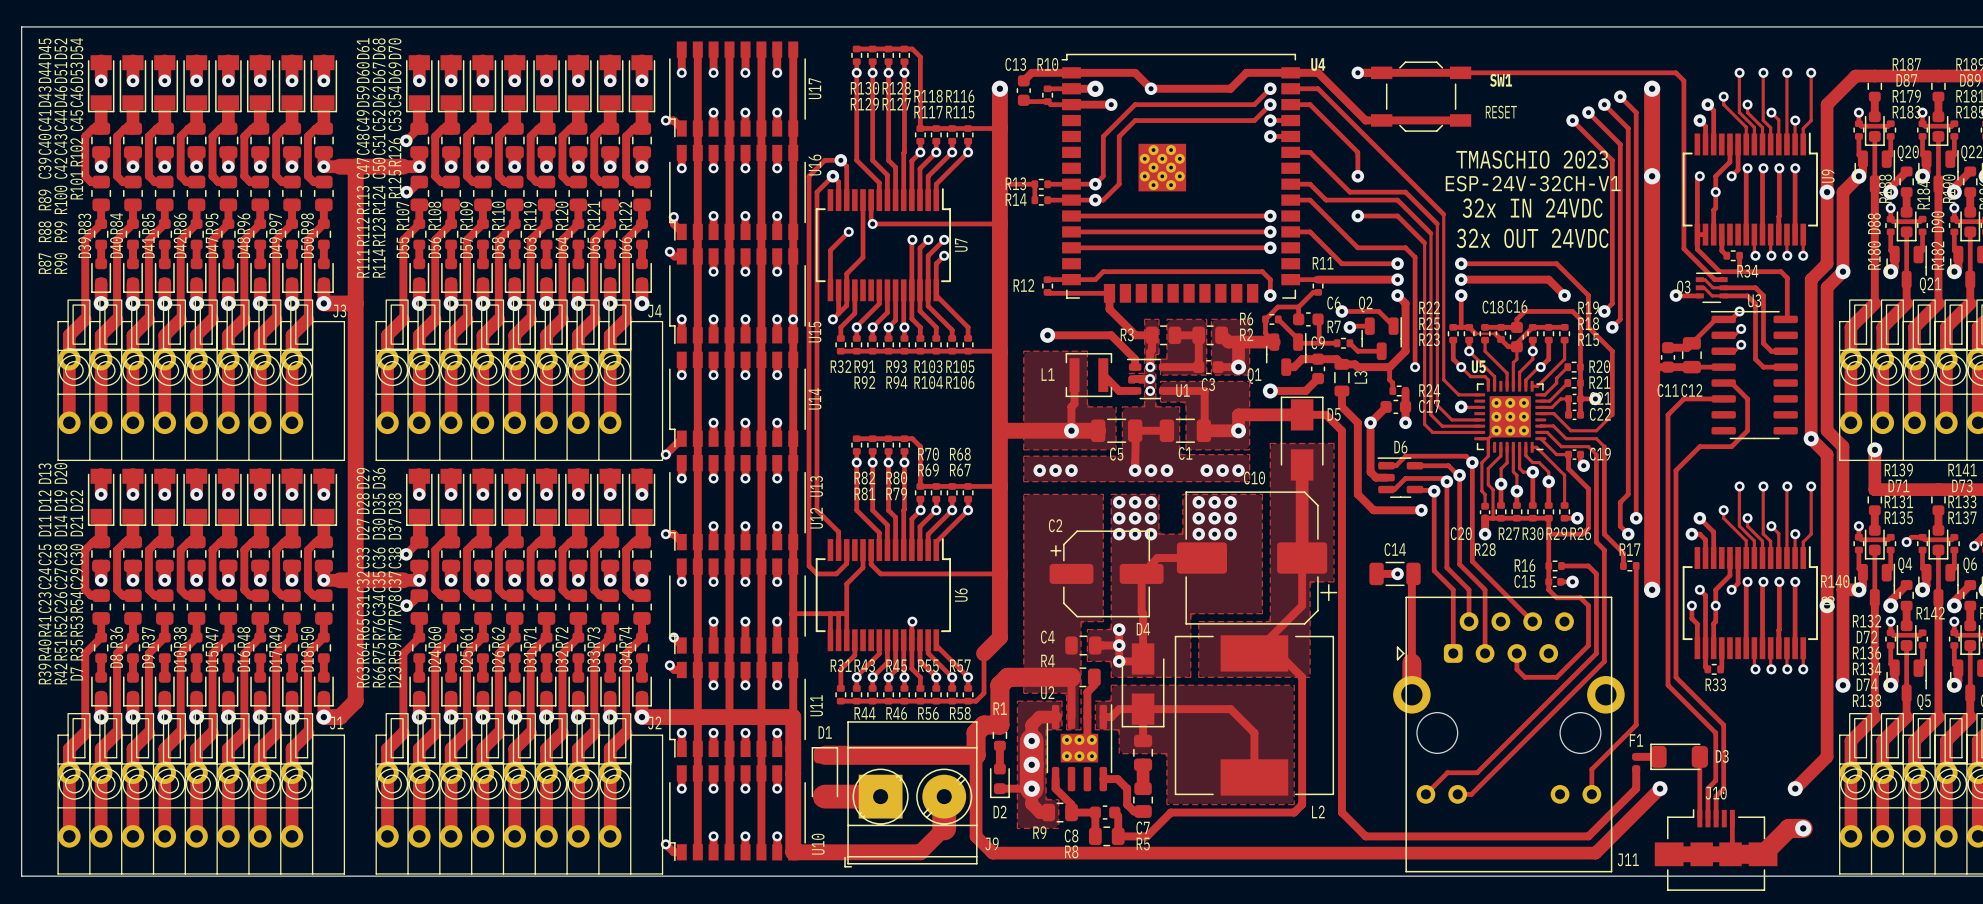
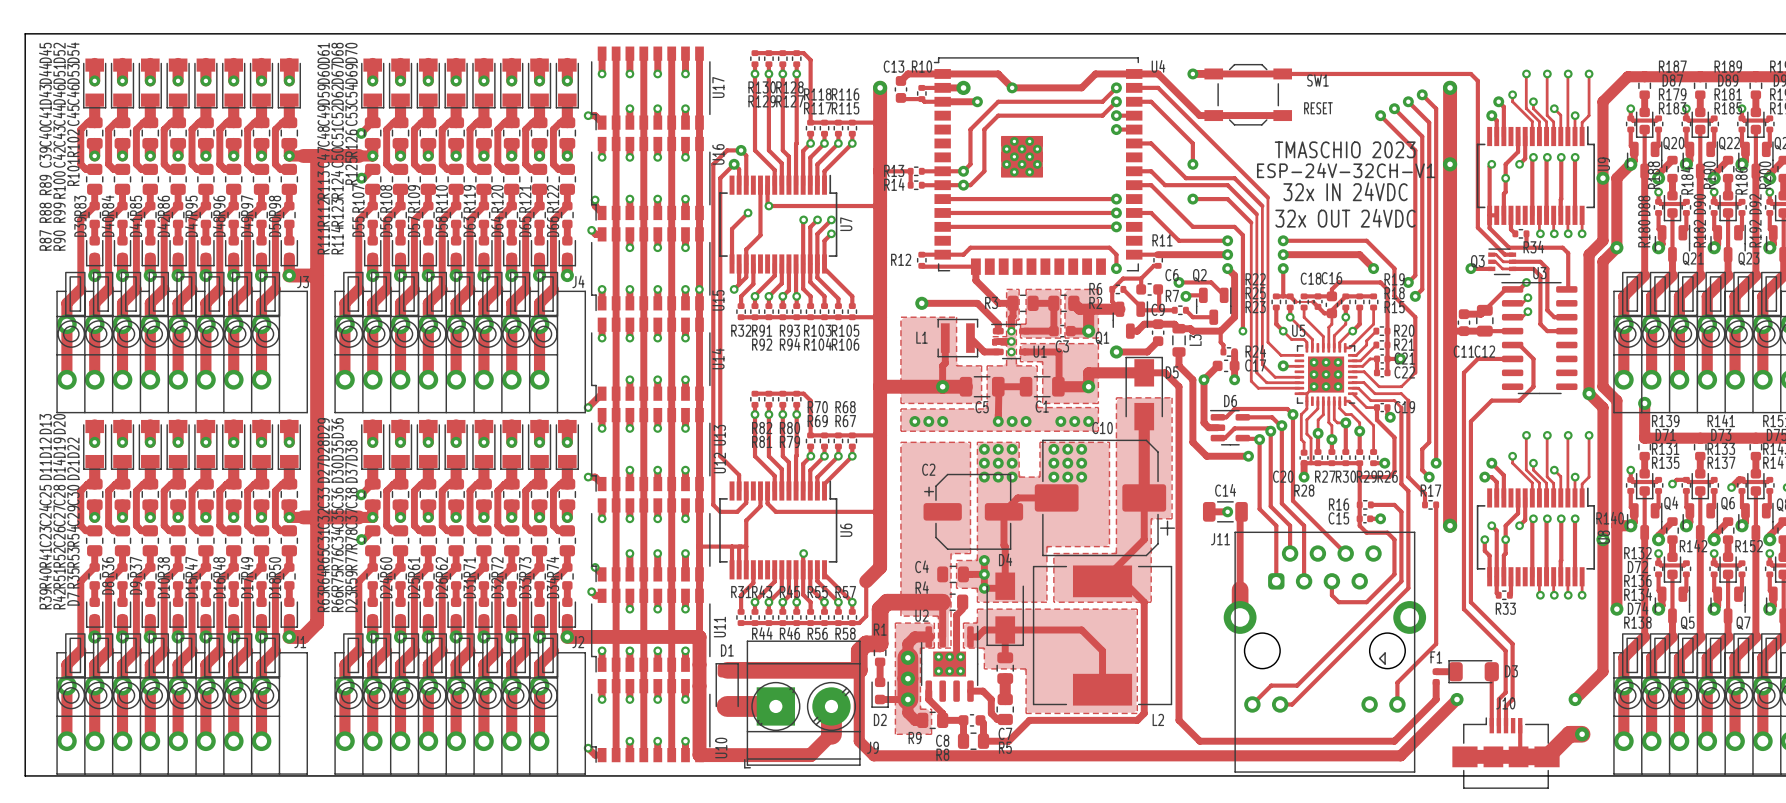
J11 footprint: [1393, 596, 1625, 873] -> [1223, 531, 1427, 773]
J11 name position: J11 (1628, 859) -> J11 (1220, 539)

